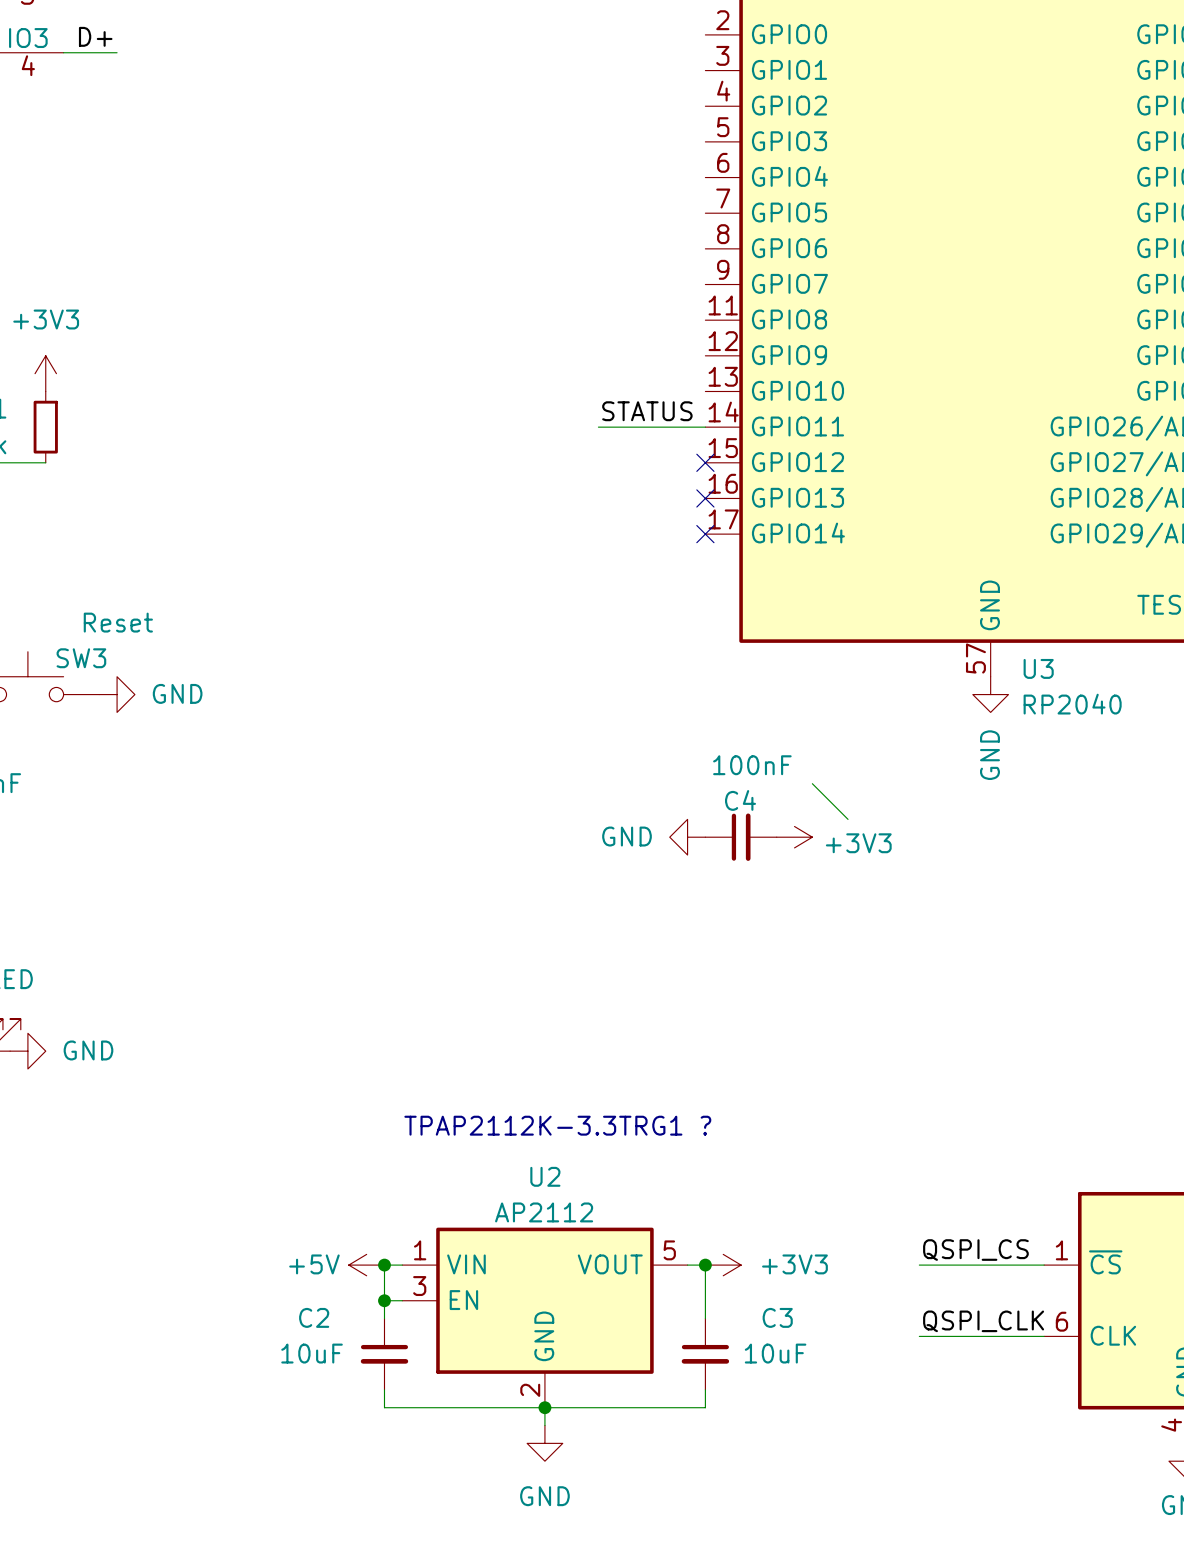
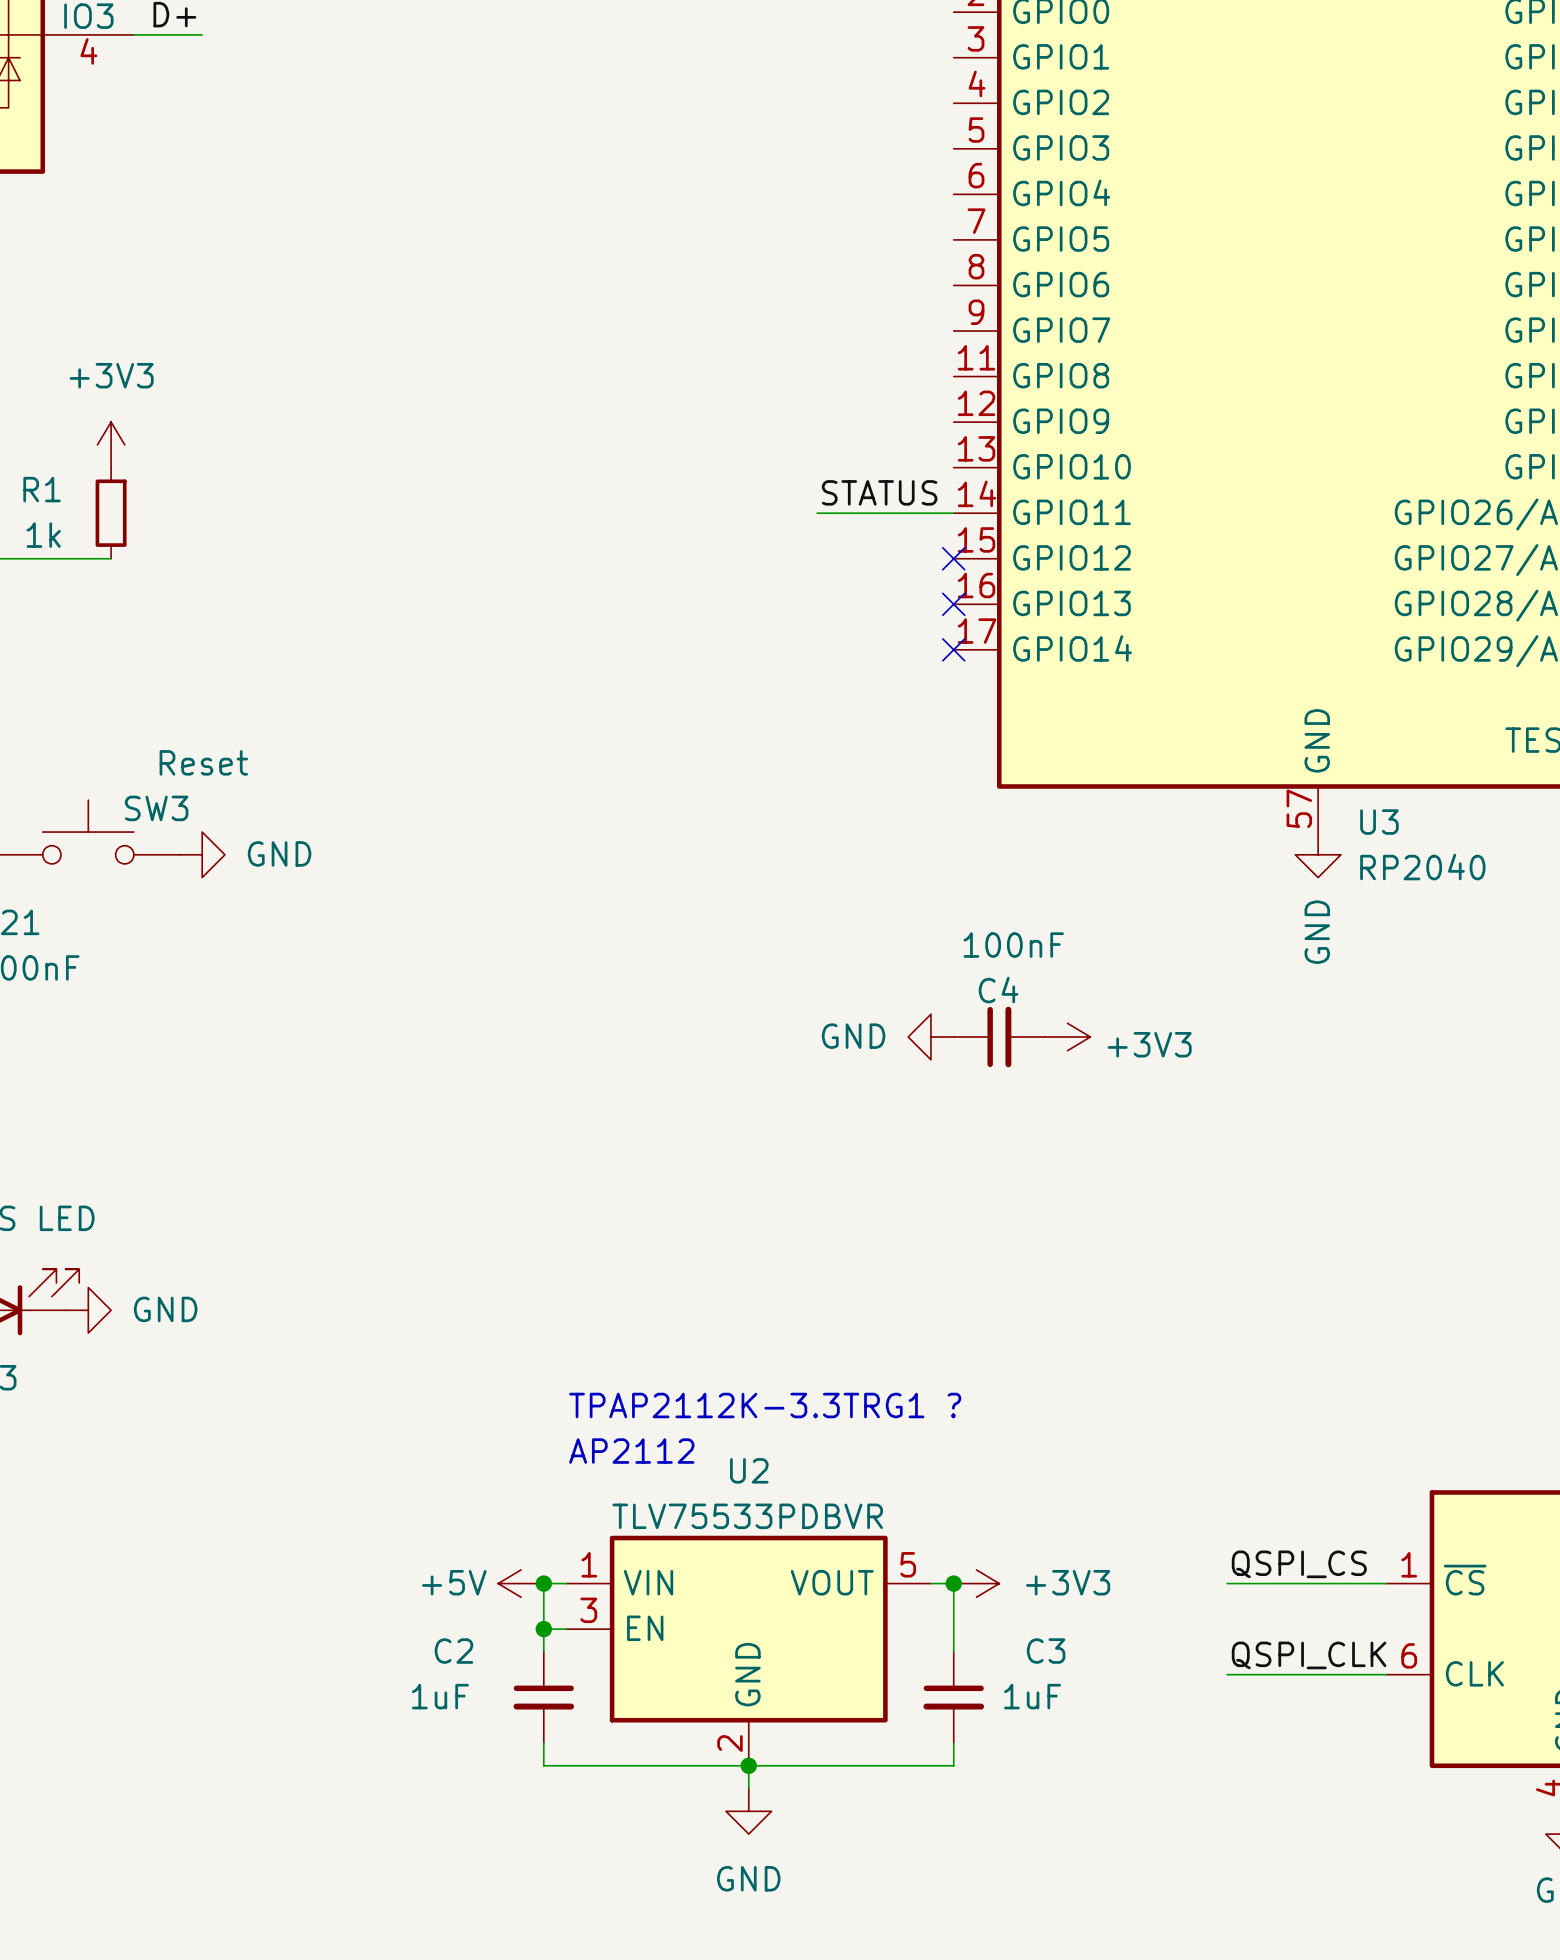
wire: (812, 783) (848, 819) -> none
text: none -> AP2112 (631, 1451)
U2 value: AP2112 (544, 1212) -> TLV75533PDBVR (747, 1516)
C2 value: 10uF (312, 1353) -> 1uF (440, 1696)
C3 value: 10uF (775, 1353) -> 1uF (1032, 1696)

